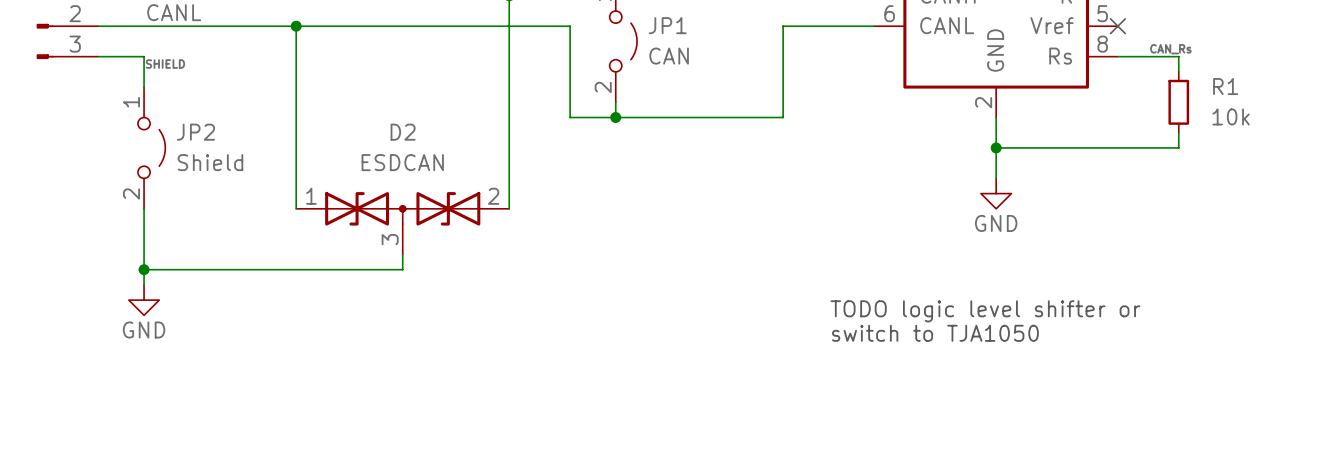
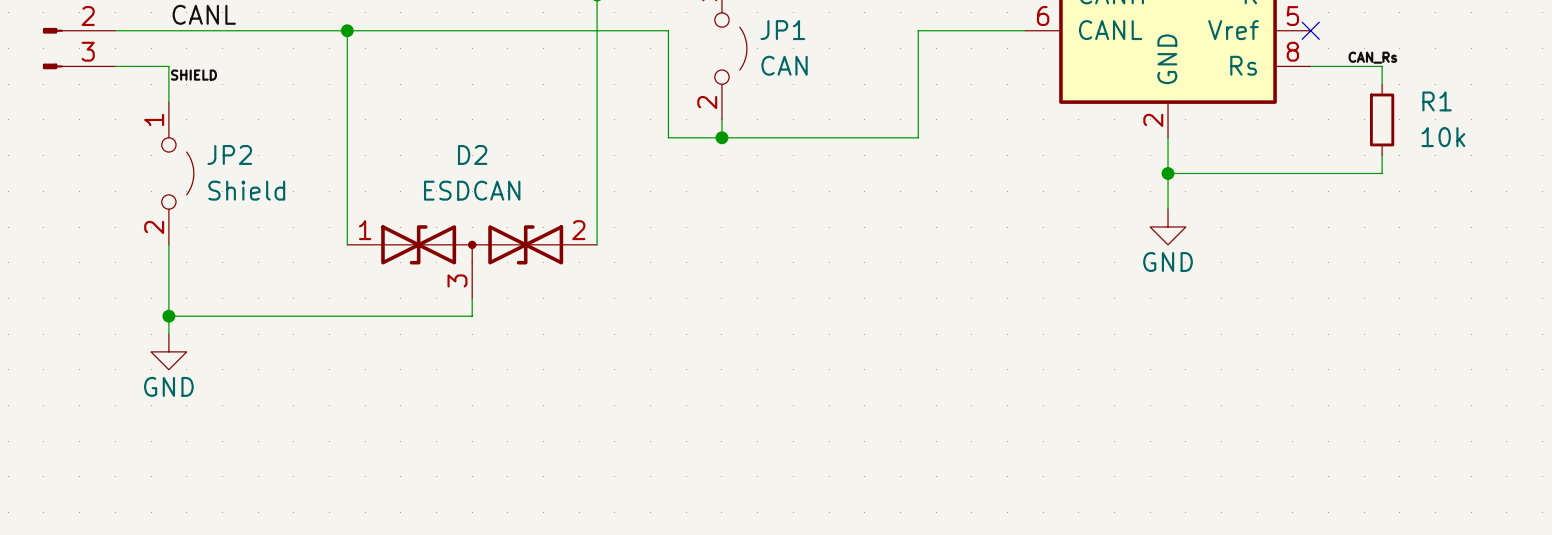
text: TODO logic level shifter or (985, 311) -> none
text: switch to TJA1050 (935, 333) -> none

